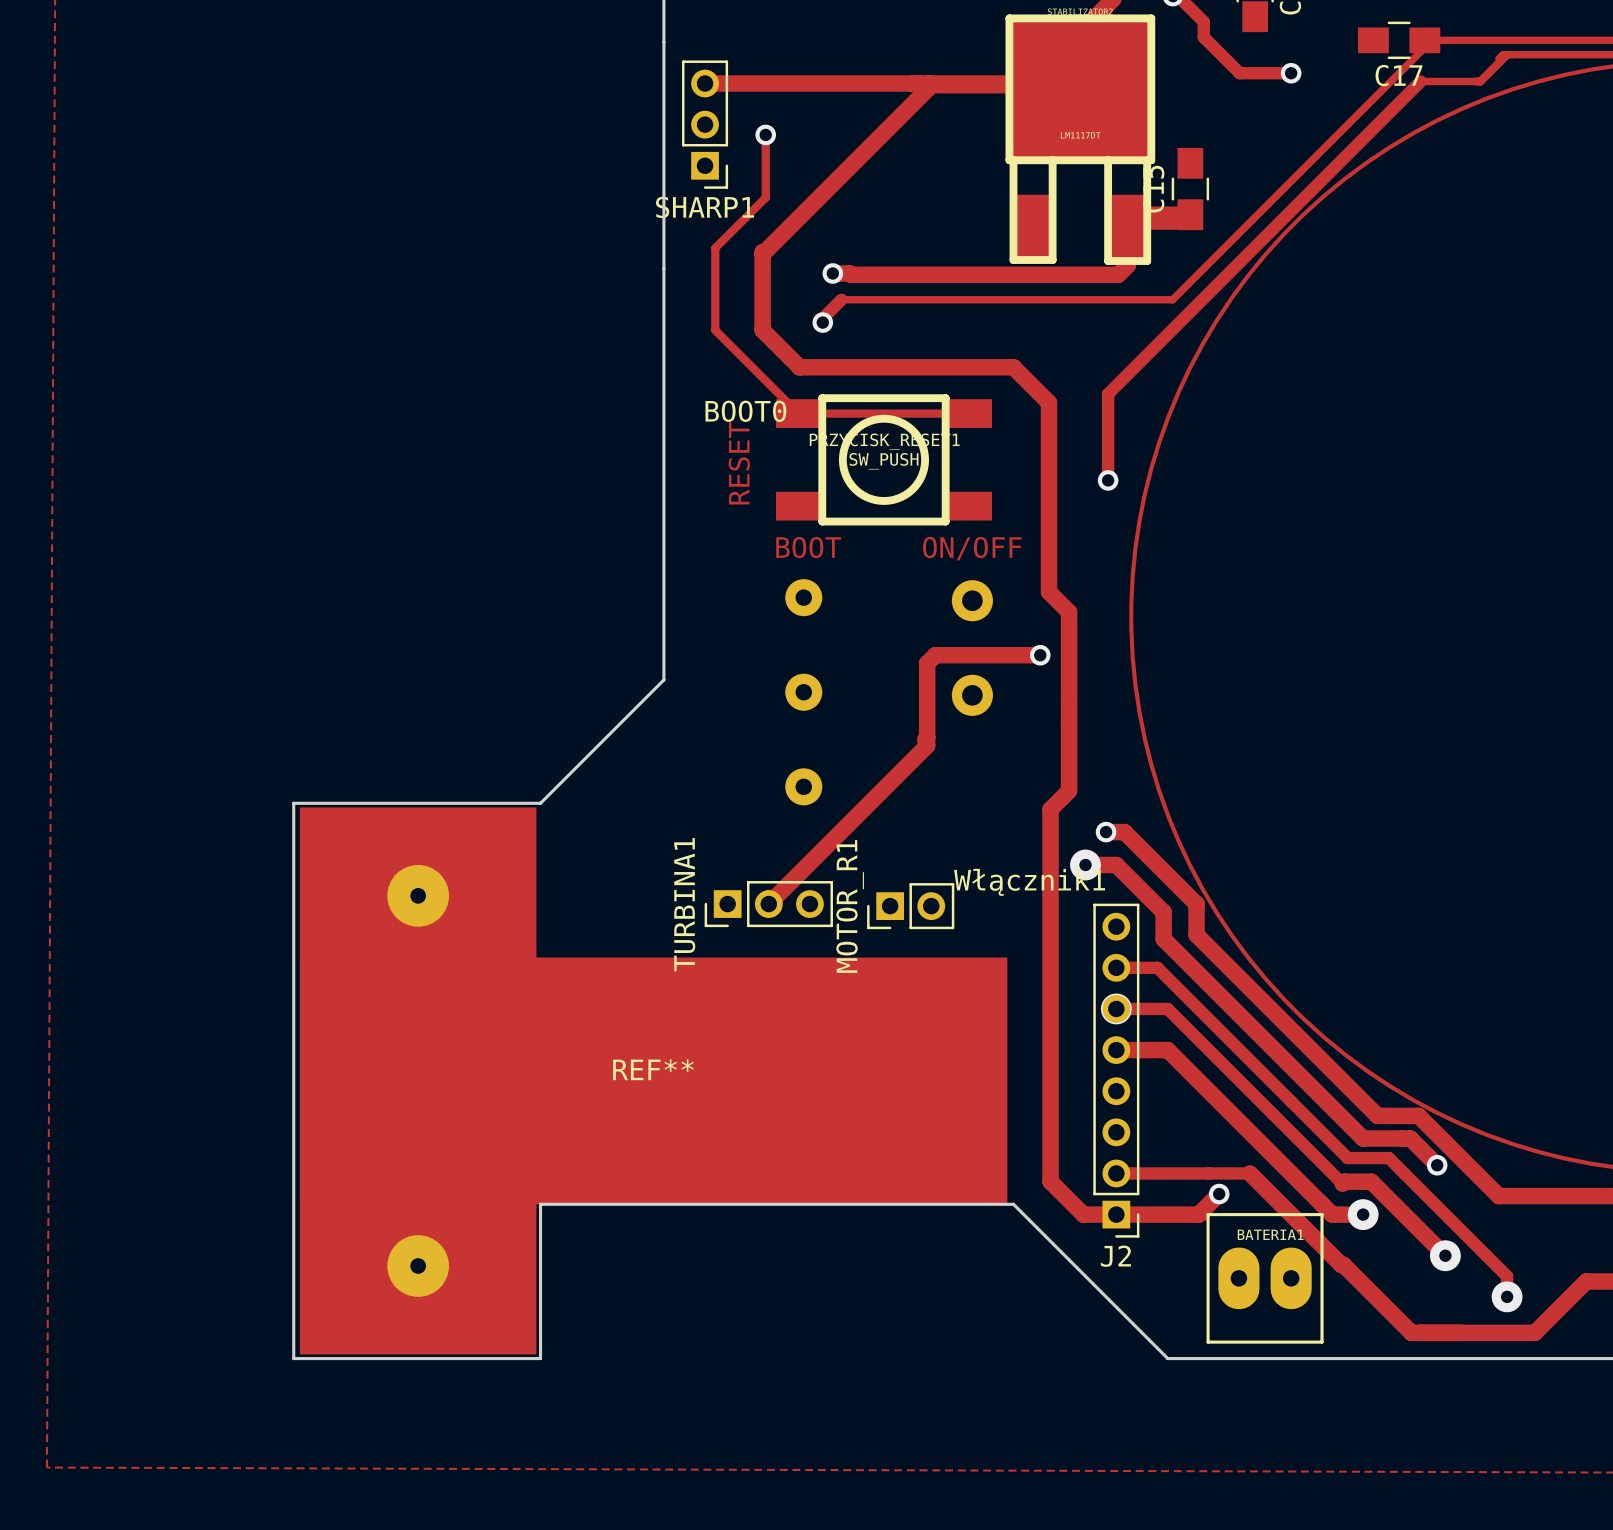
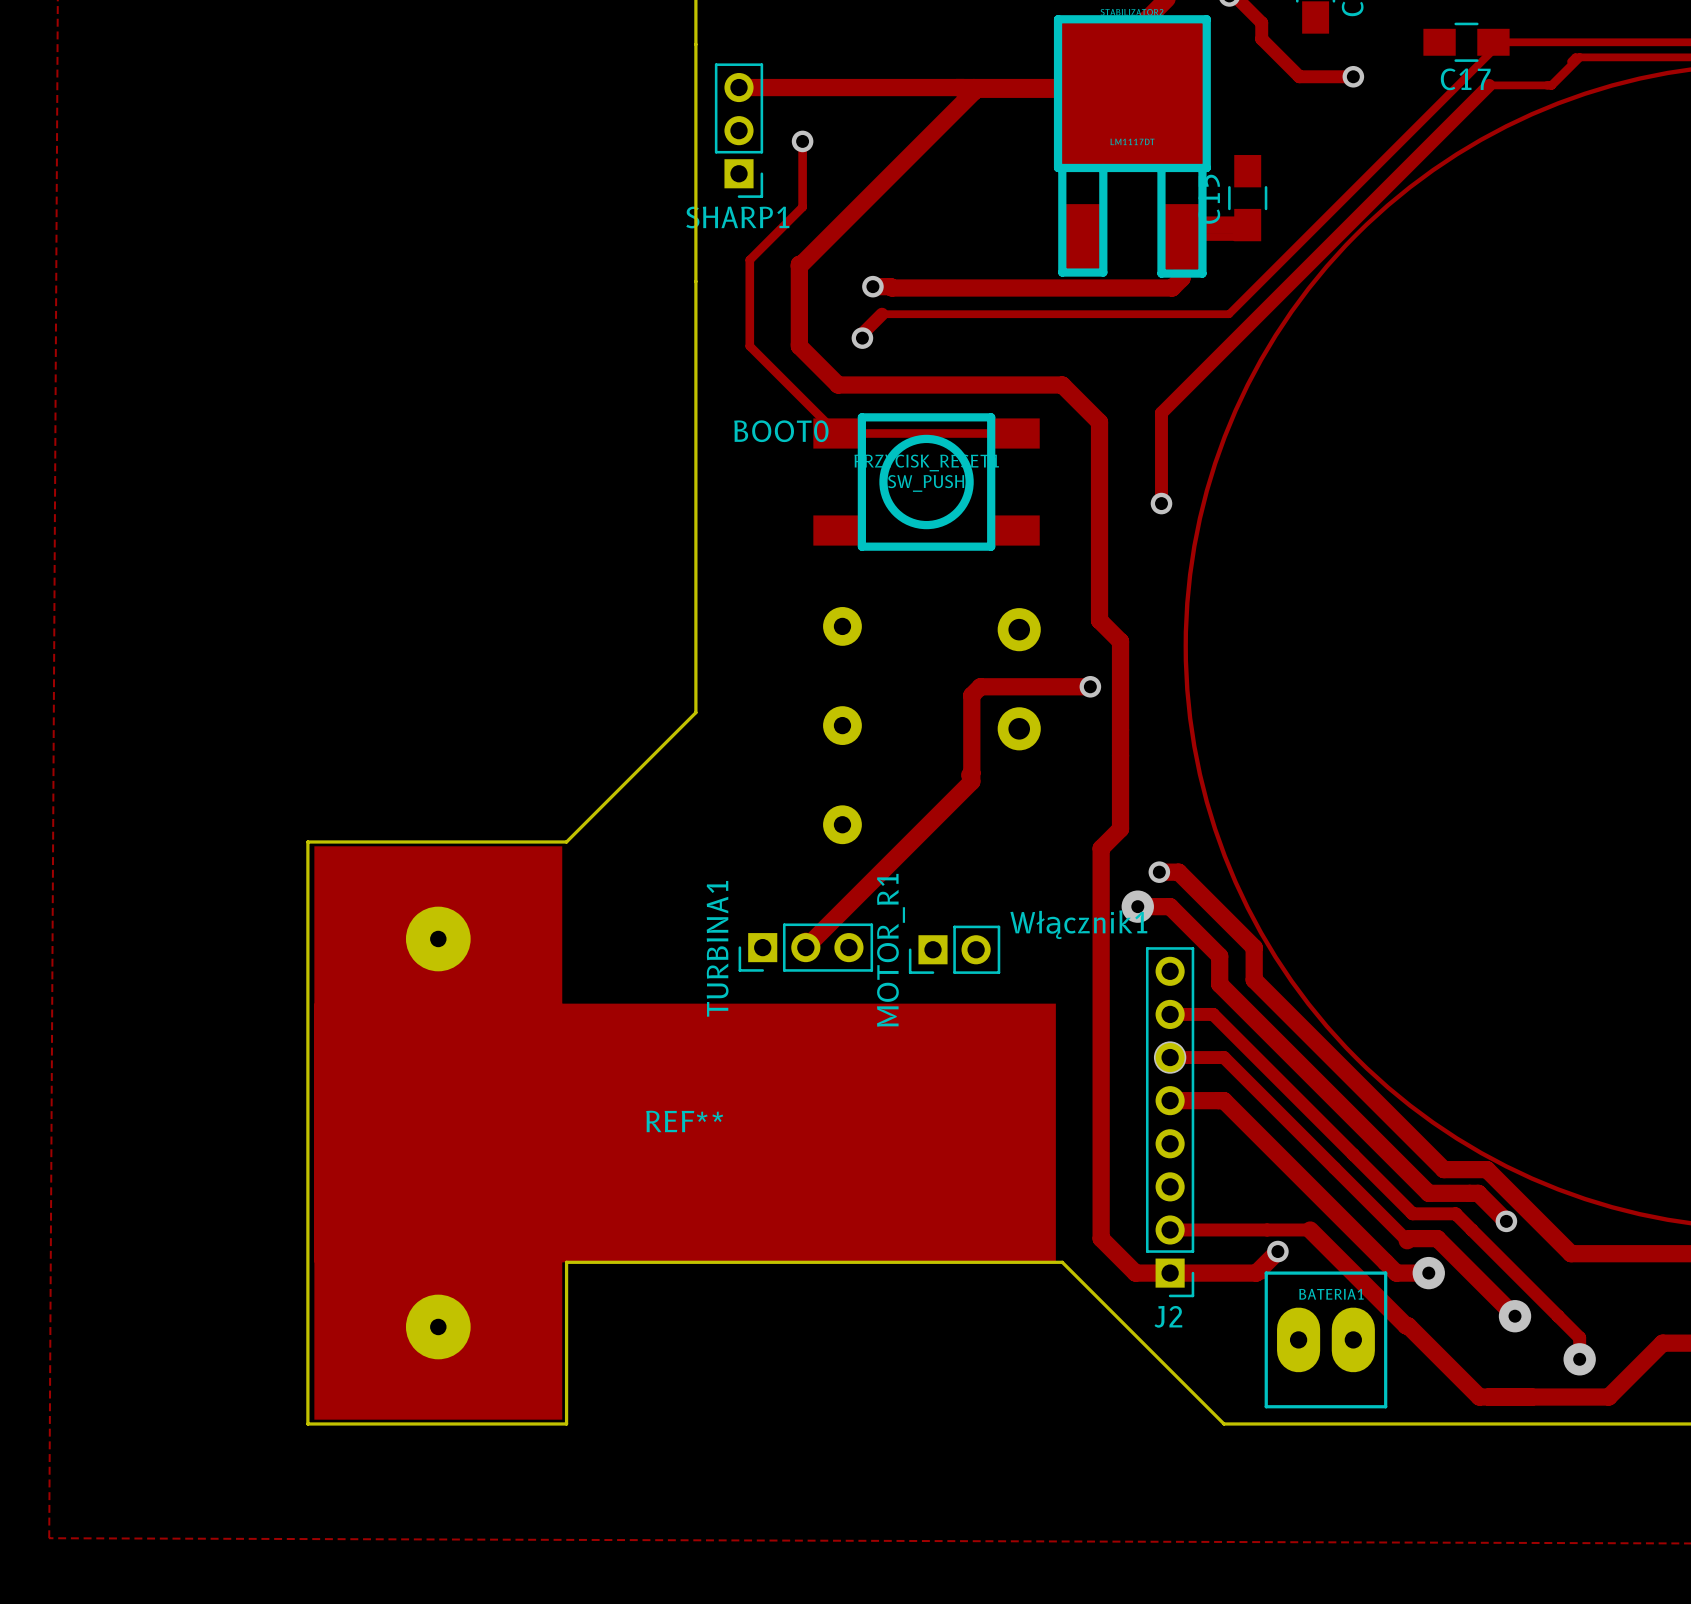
text: RESET (739, 463) -> none
text: BOOT (808, 547) -> none
text: ON/OFF (972, 548) -> none

